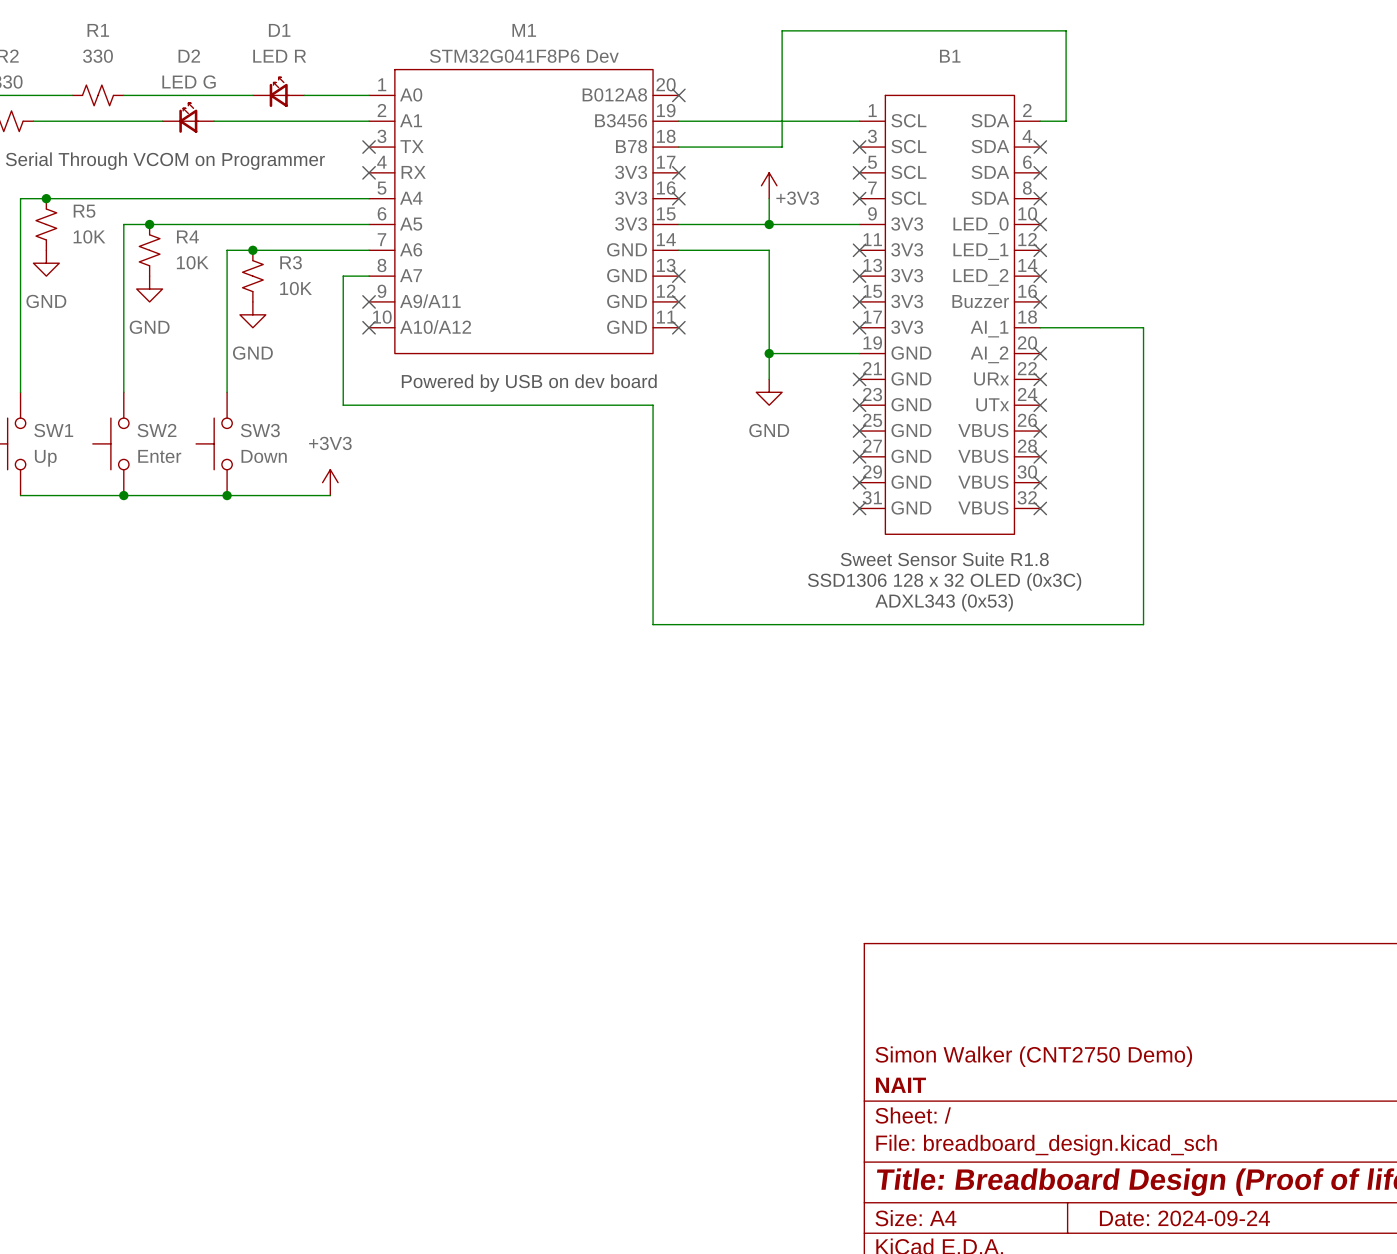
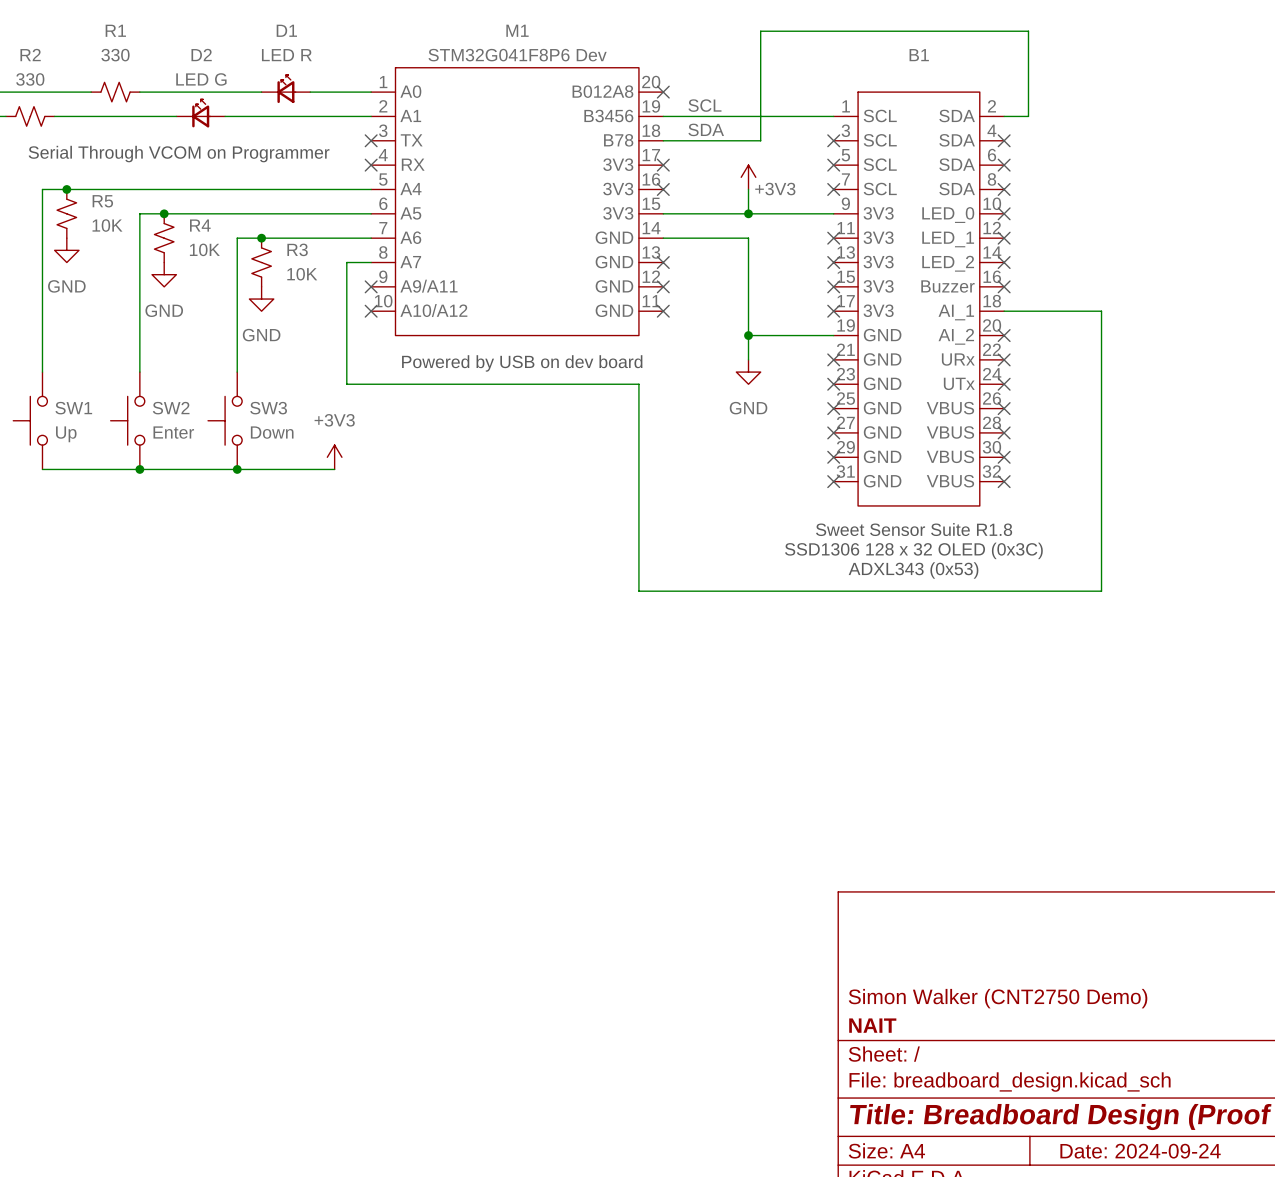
label: none -> SCL (704, 105)
label: none -> SDA (706, 129)

